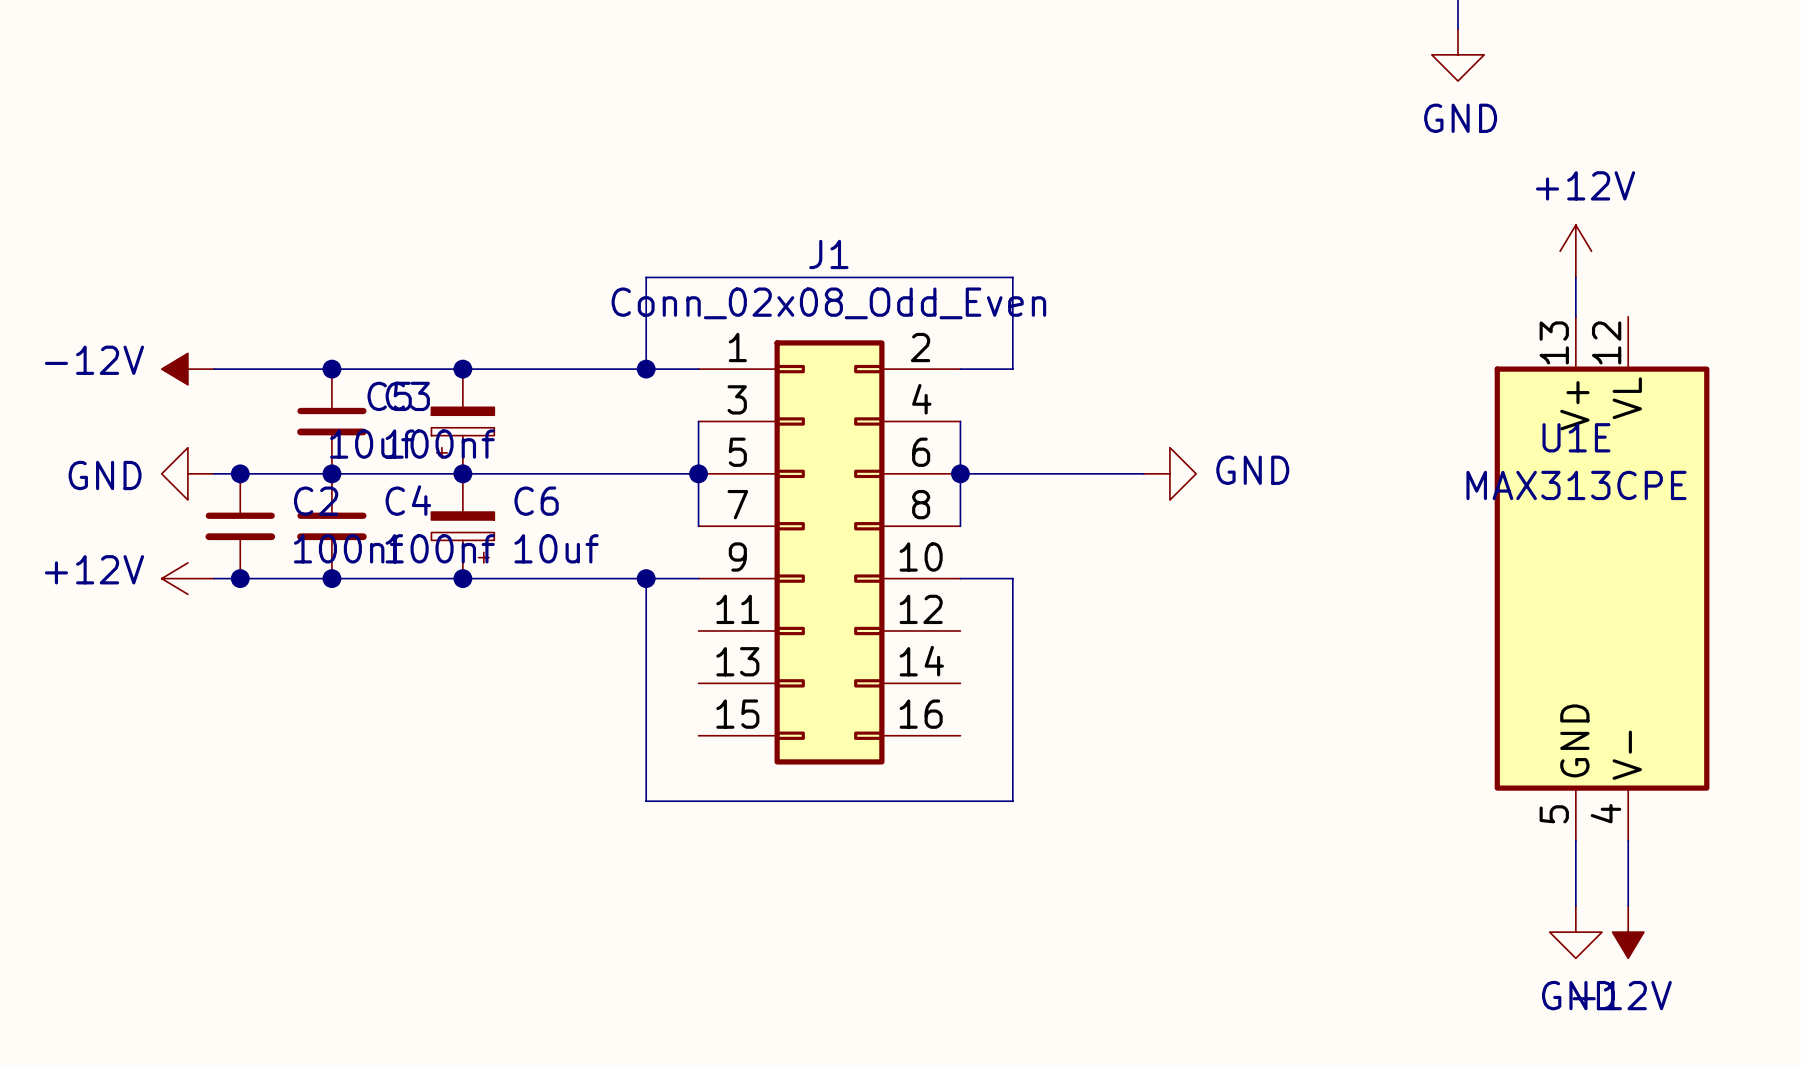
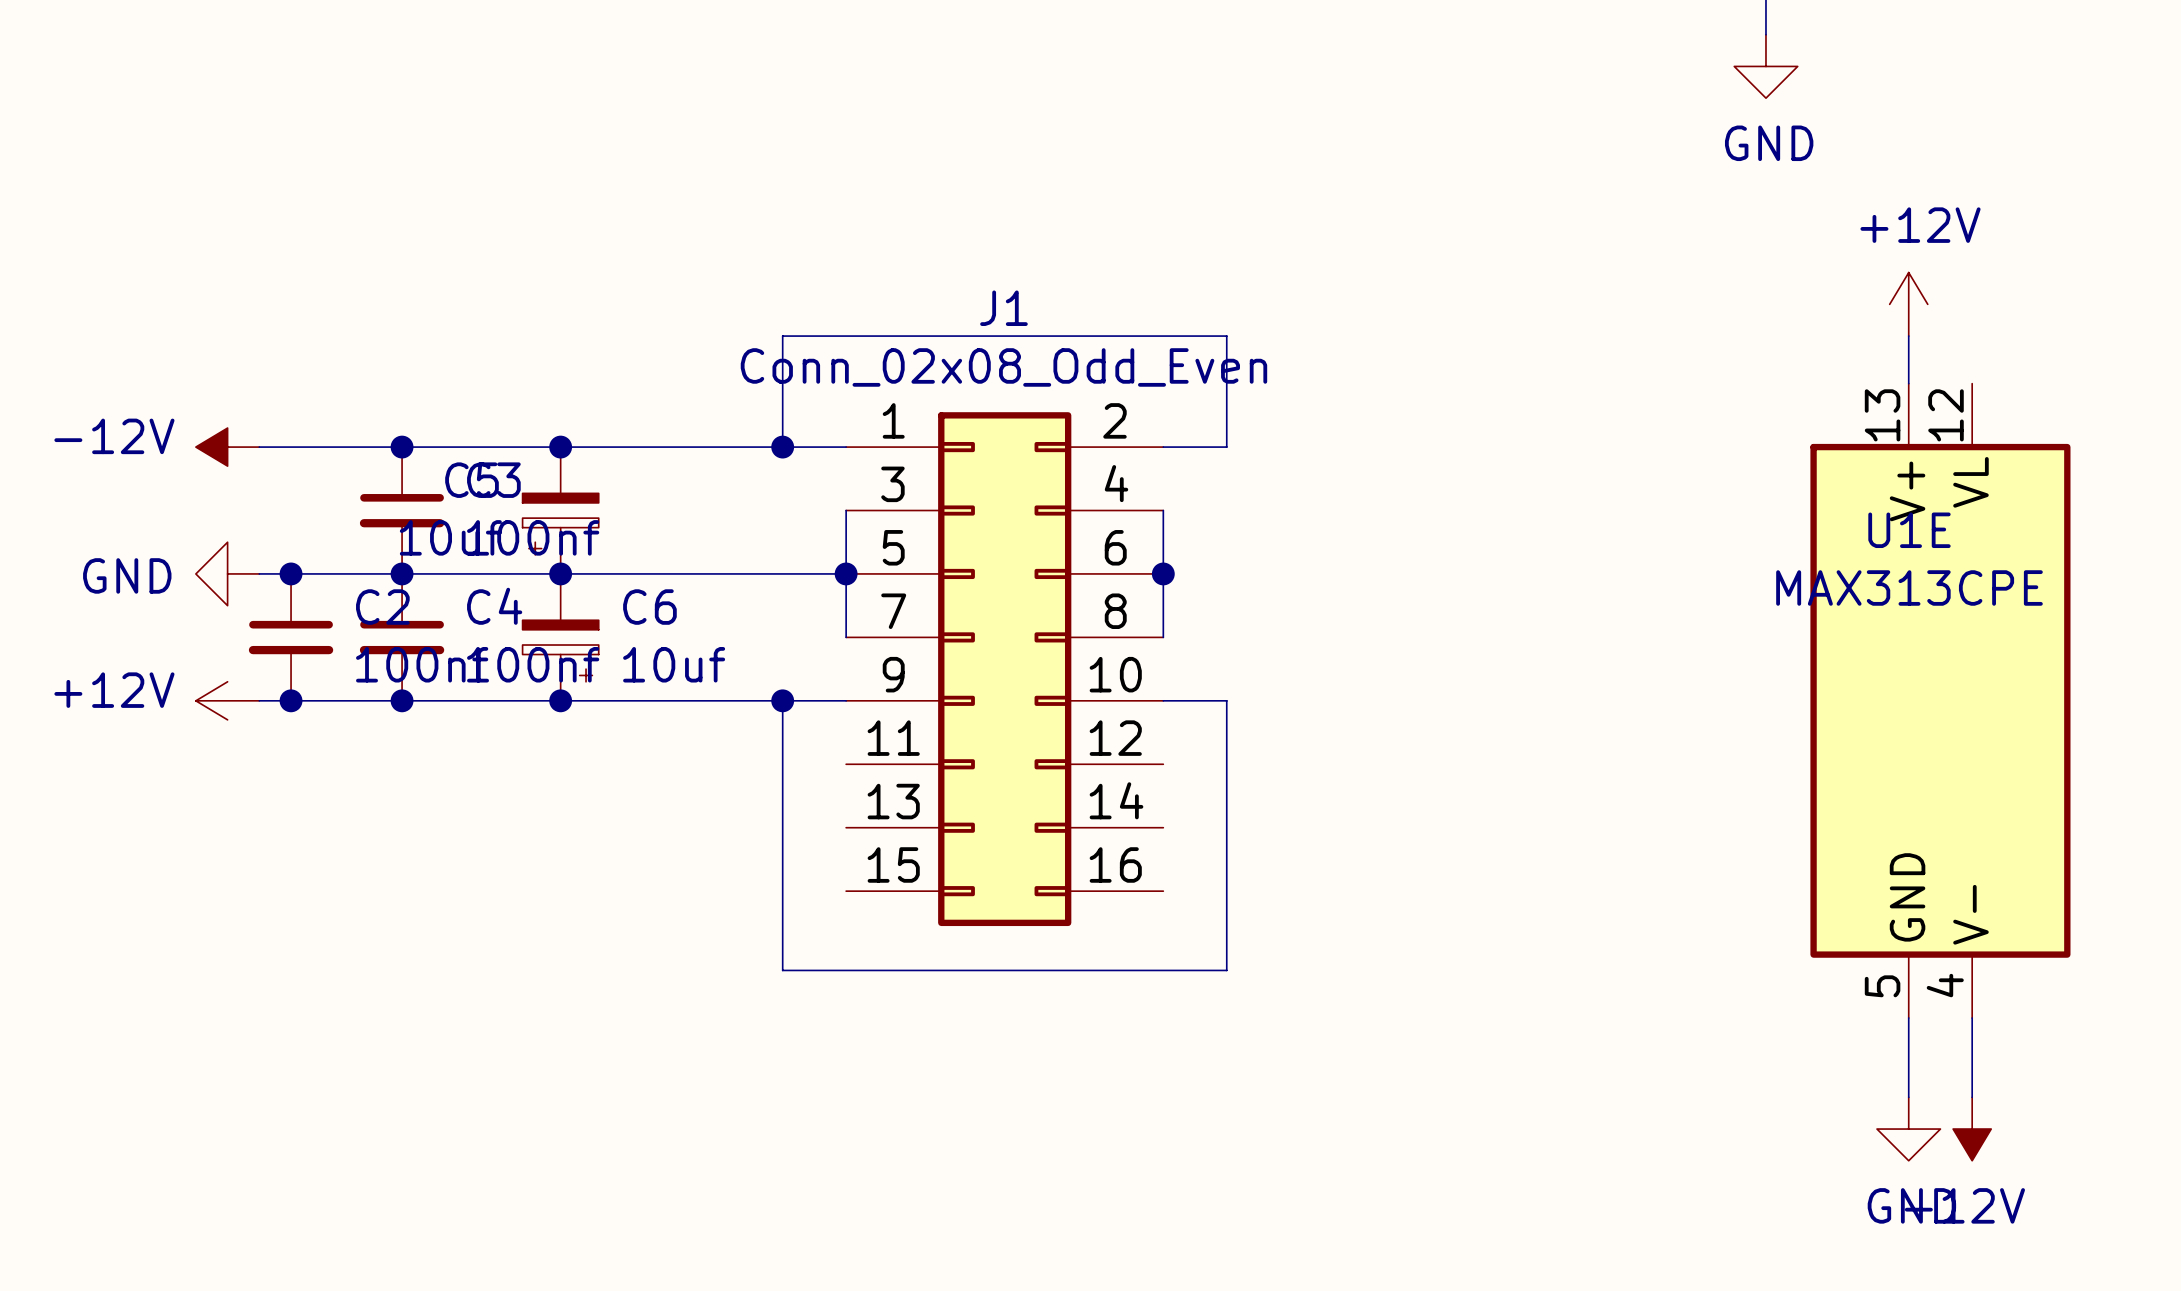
wire: (960, 473) (1143, 473) -> none
power symbol: GND (1169, 473) -> none

